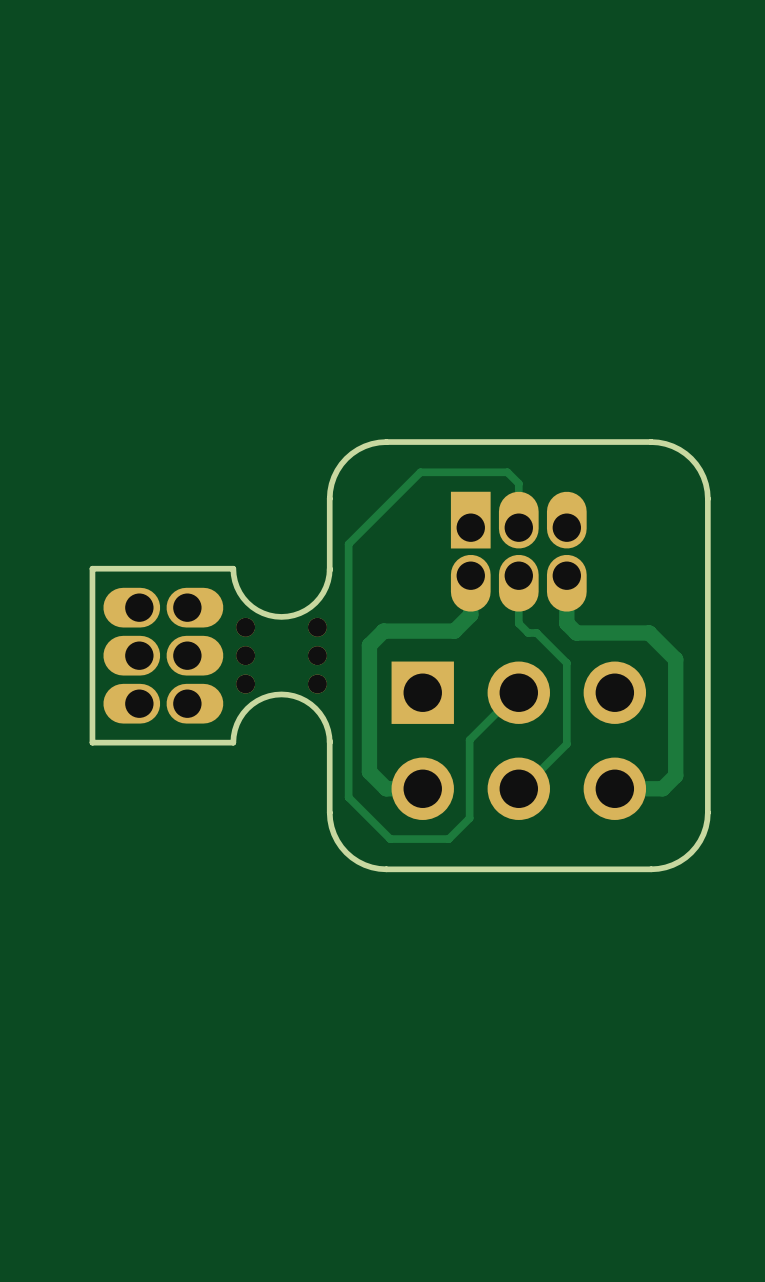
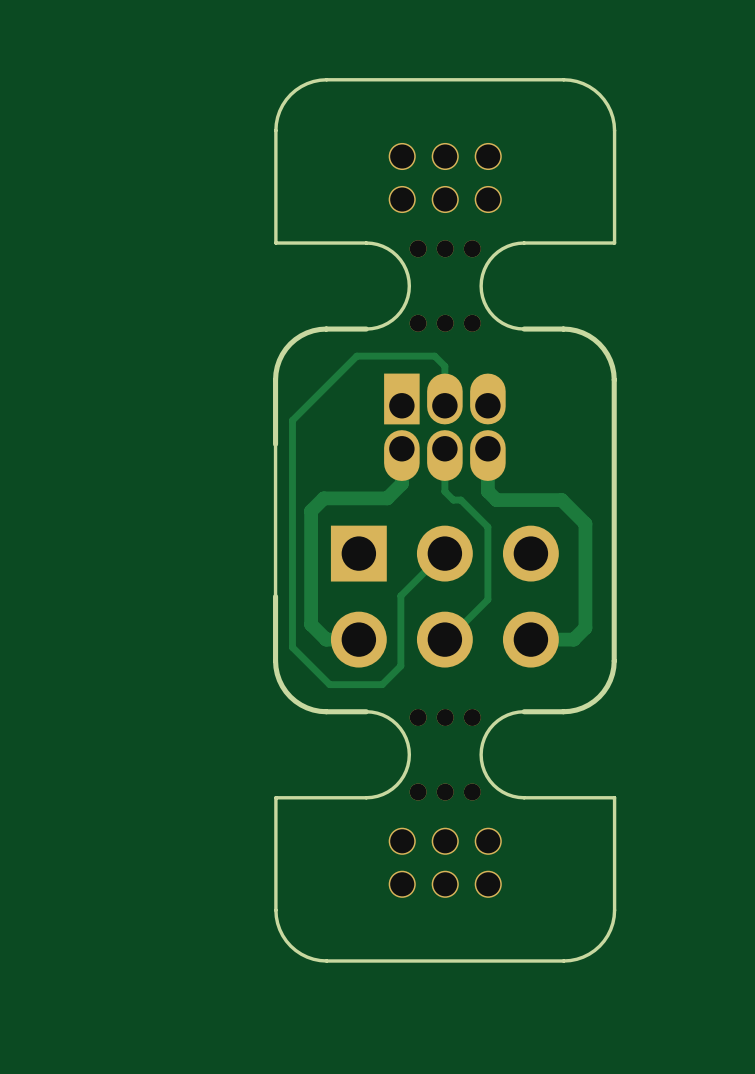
part: none -> (445, 177)
part: none -> (445, 286)
board edge: (607, 442) (431, 442) -> (524, 329) (513, 327) (497, 320) (484, 302) (481, 280) (486, 264) (493, 255) (502, 248) (518, 243) (614, 243) (614, 130) (612, 117) (607, 105) (599, 94) (589, 86) (576, 81) (563, 79) (326, 79) (307, 83) (295, 90) (286, 99) (279, 111) (276, 123) (275, 243) (377, 244) (392, 251) (406, 269) (408, 291) (403, 307) (387, 323) (366, 329)
board edge: (329, 568) (326, 587) (315, 602) (299, 613) (281, 616) (263, 613) (247, 602) (236, 587) (233, 568) (92, 568) (92, 742) (233, 742) (236, 724) (247, 708) (263, 698) (281, 694) (299, 698) (315, 708) (326, 724) (329, 742) -> none
board edge: none -> (275, 444) (275, 596)
part: (163, 655) -> none
part: (281, 655) -> none
board edge: (607, 869) (431, 869) -> (524, 711) (502, 717) (490, 728) (484, 738) (481, 760) (486, 776) (493, 785) (502, 792) (518, 797) (614, 797) (614, 910) (612, 923) (607, 935) (599, 946) (589, 954) (576, 959) (563, 961) (326, 961) (307, 957) (295, 950) (286, 941) (279, 929) (276, 916) (275, 797) (377, 796) (392, 788) (406, 771) (408, 749) (403, 733) (387, 717) (366, 711)
part: none -> (445, 754)
part: none -> (445, 862)

